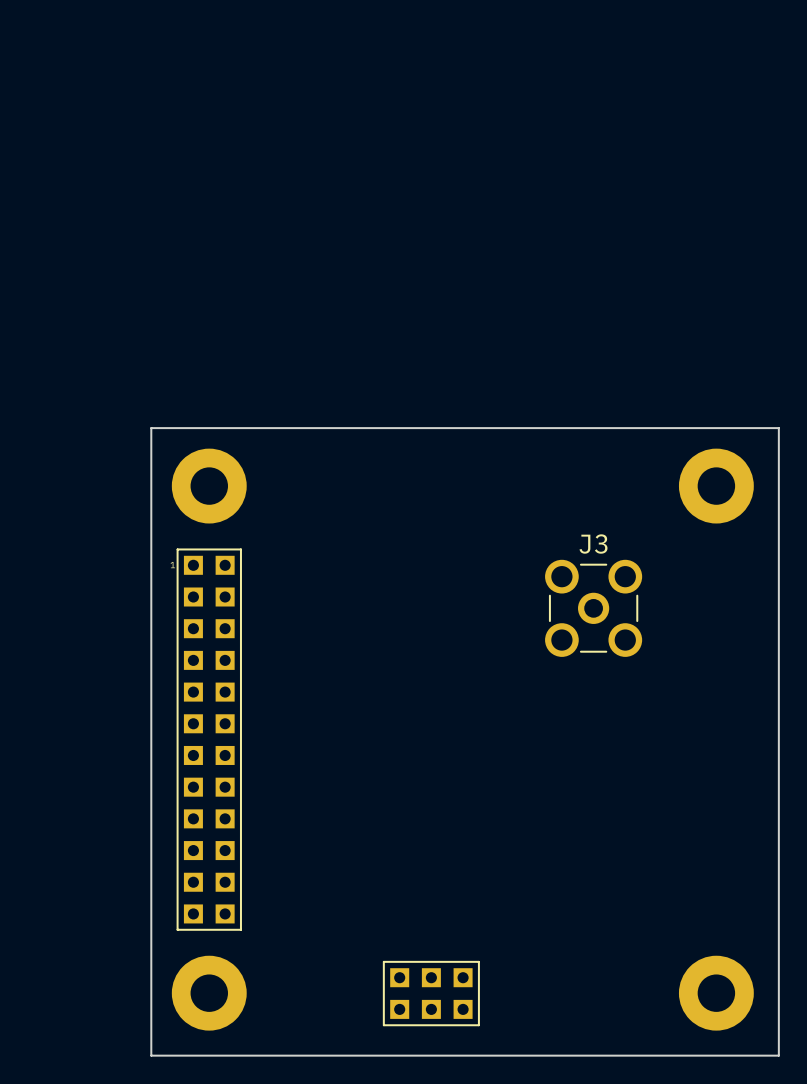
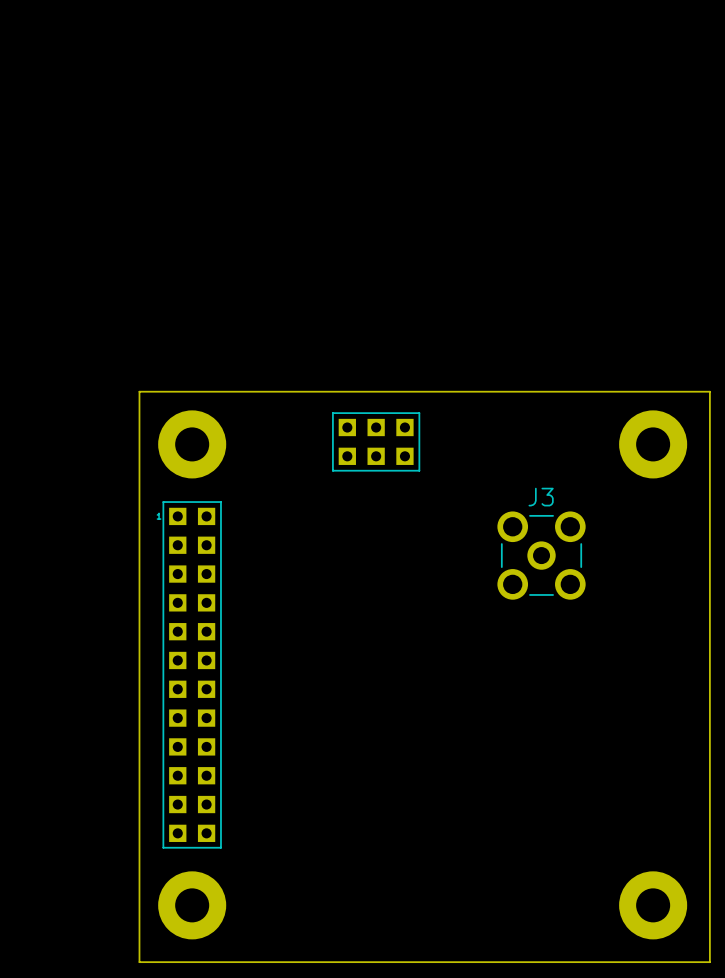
part: none -> (376, 441)
part: (431, 993) -> none

